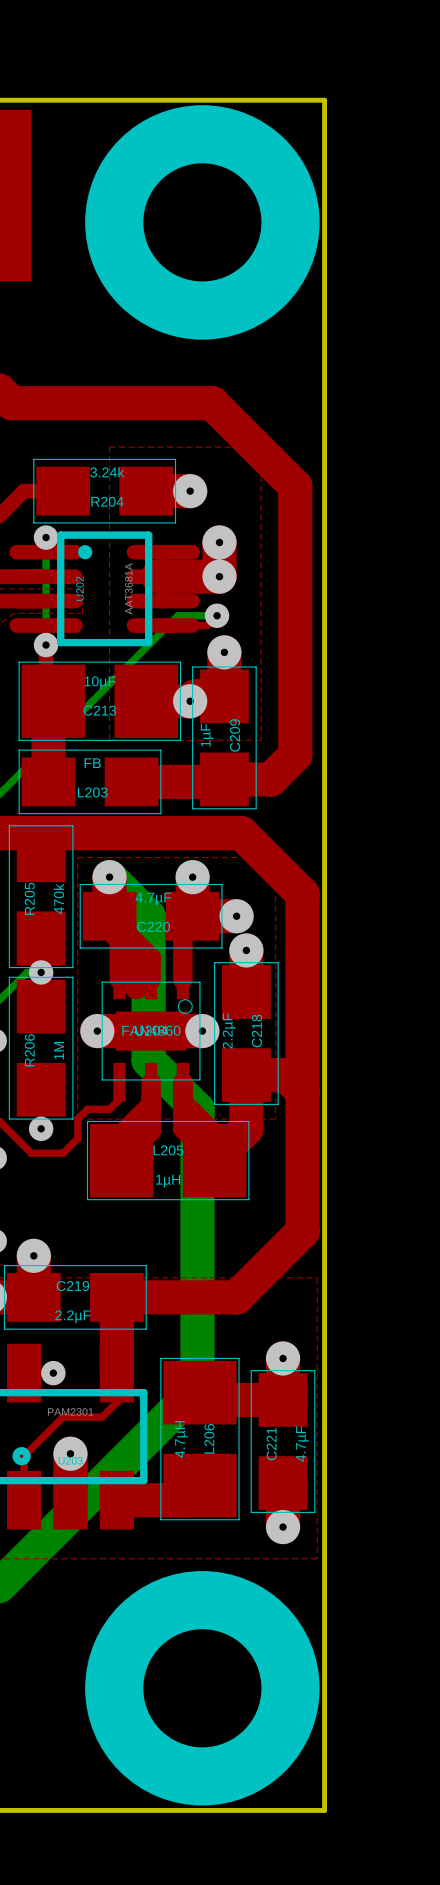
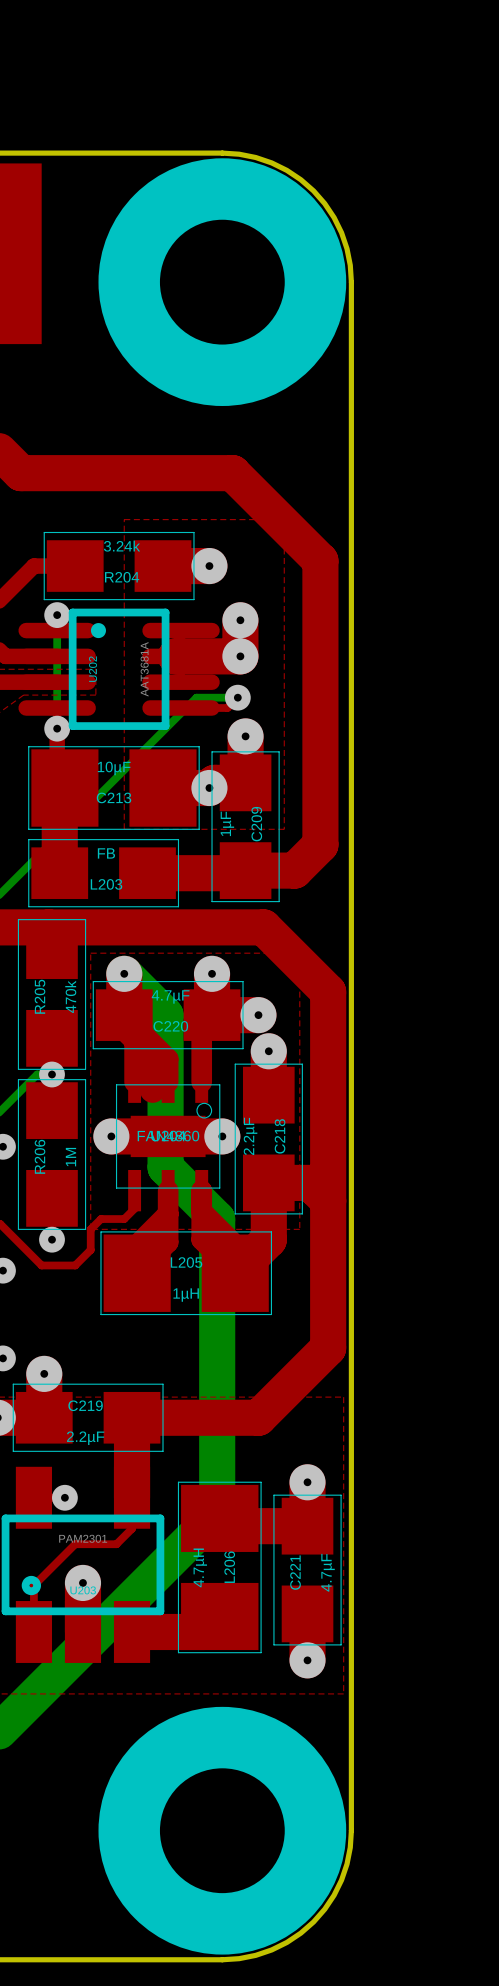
board edge: (202, 100) (324, 100) (324, 222) -> (222, 153) (239, 154) (271, 162) (300, 179) (313, 190) (334, 217) (341, 232) (350, 265) (351, 282)
board edge: (324, 1688) (324, 1810) (202, 1810) -> (351, 1830) (350, 1847) (341, 1880) (334, 1895) (313, 1921) (300, 1933) (271, 1949) (239, 1958) (222, 1959)

